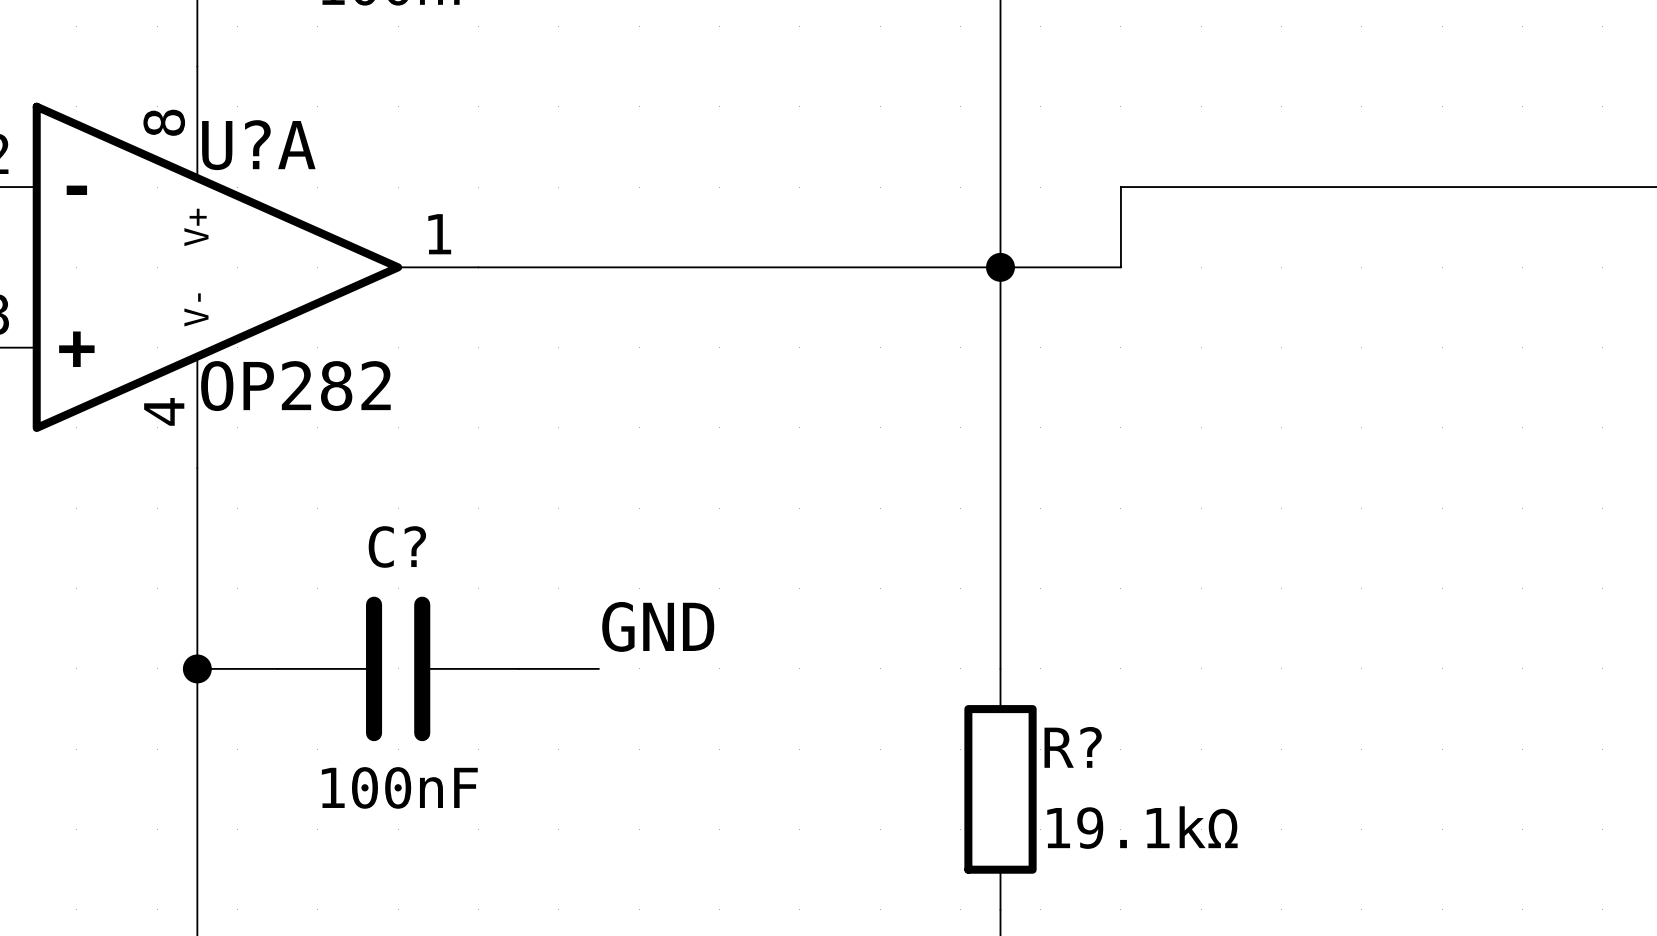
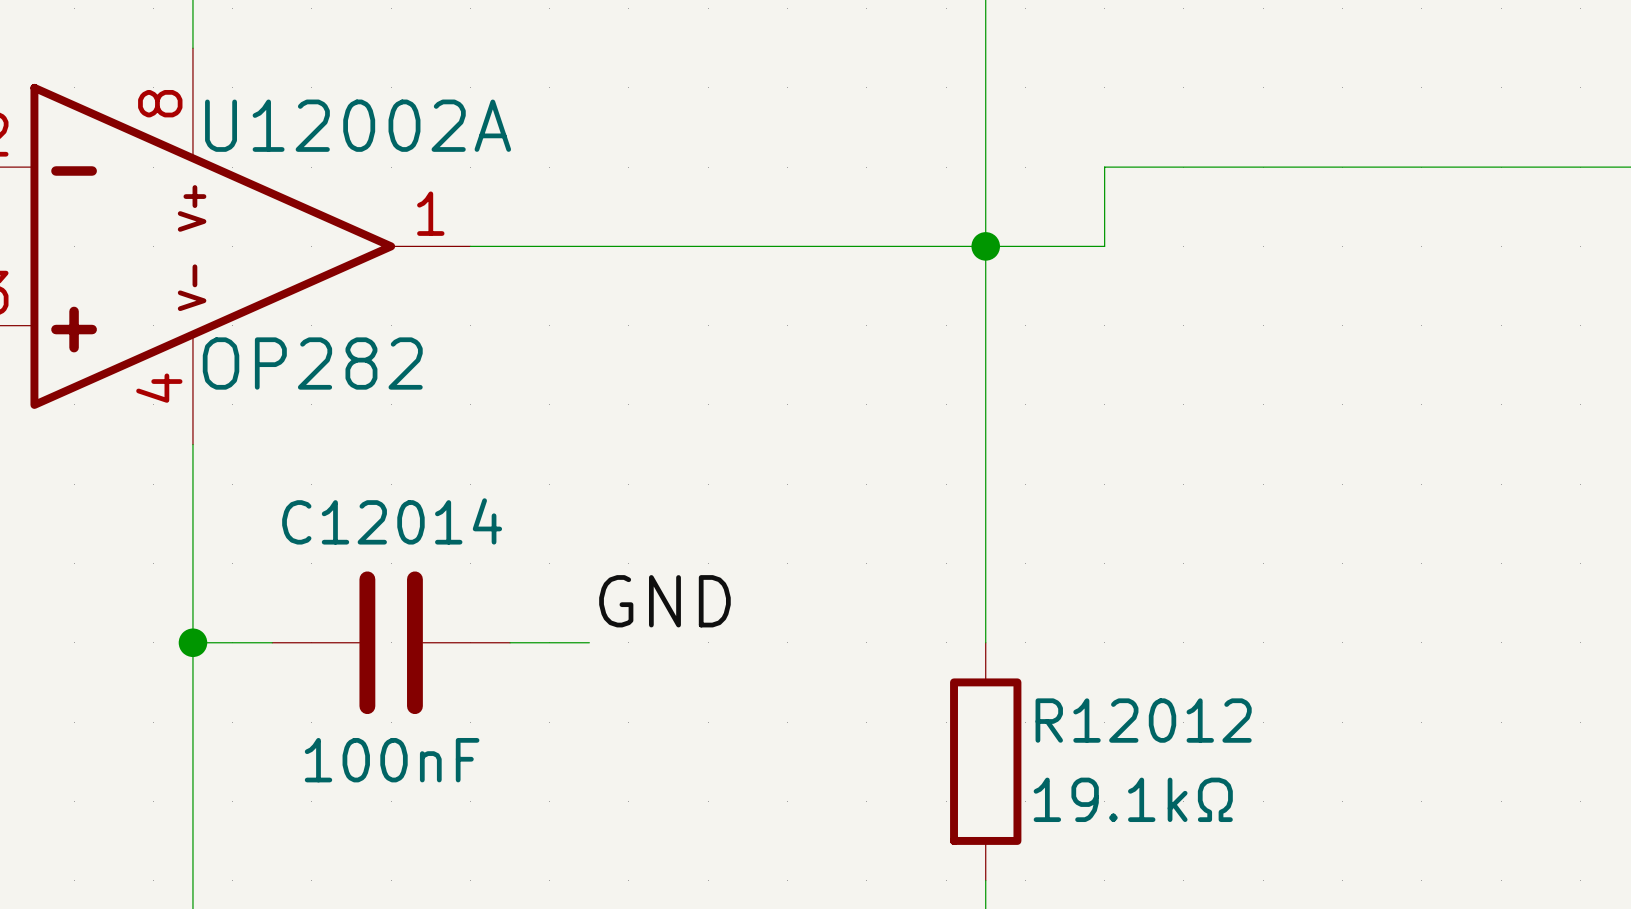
U?A name: U?A (258, 145) -> U12002A (358, 125)
C? name: C? (397, 546) -> C12014 (392, 521)
R? name: R? (1073, 747) -> R12012 (1143, 720)

